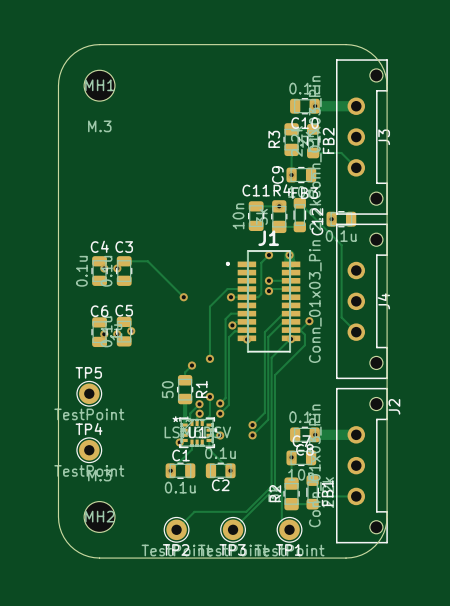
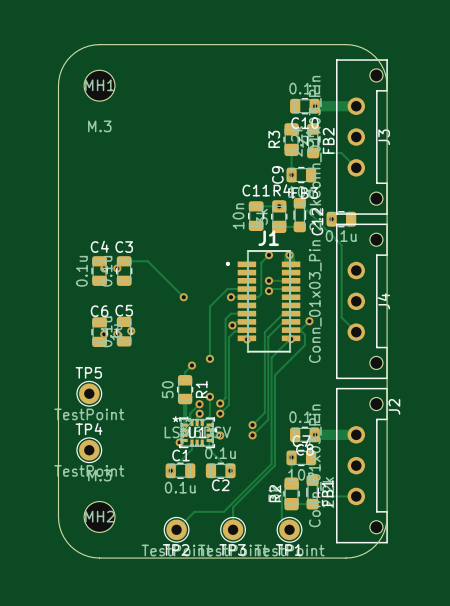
track: (271, 464) (271, 486) (246, 511) (223, 511) -> (271, 464) (223, 511)
track: (274, 465) (274, 487) (233, 529) -> (274, 465) (233, 507) (233, 529)

